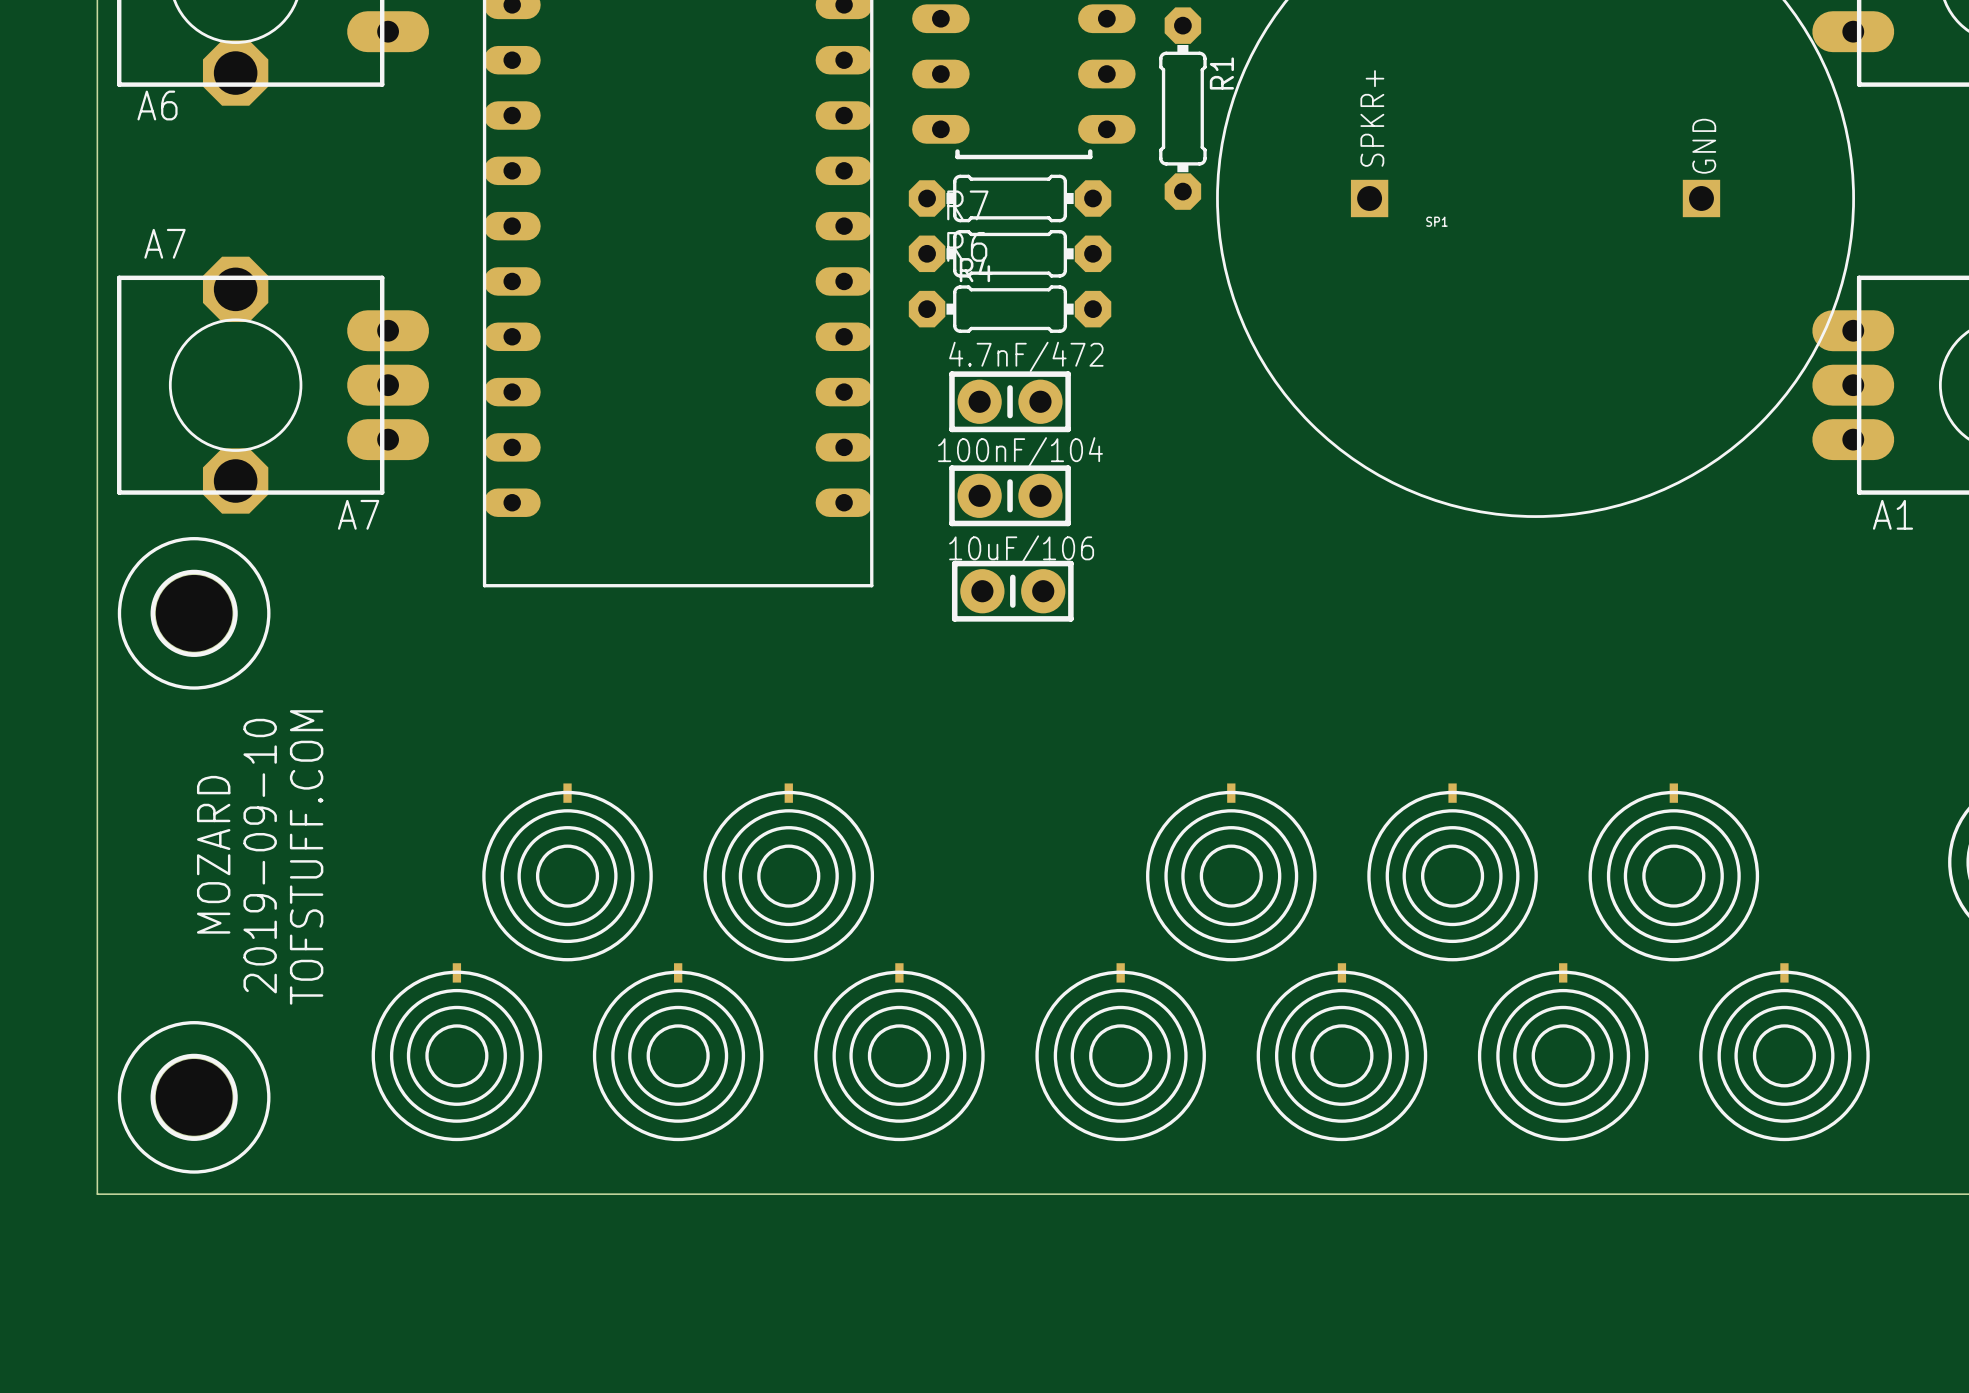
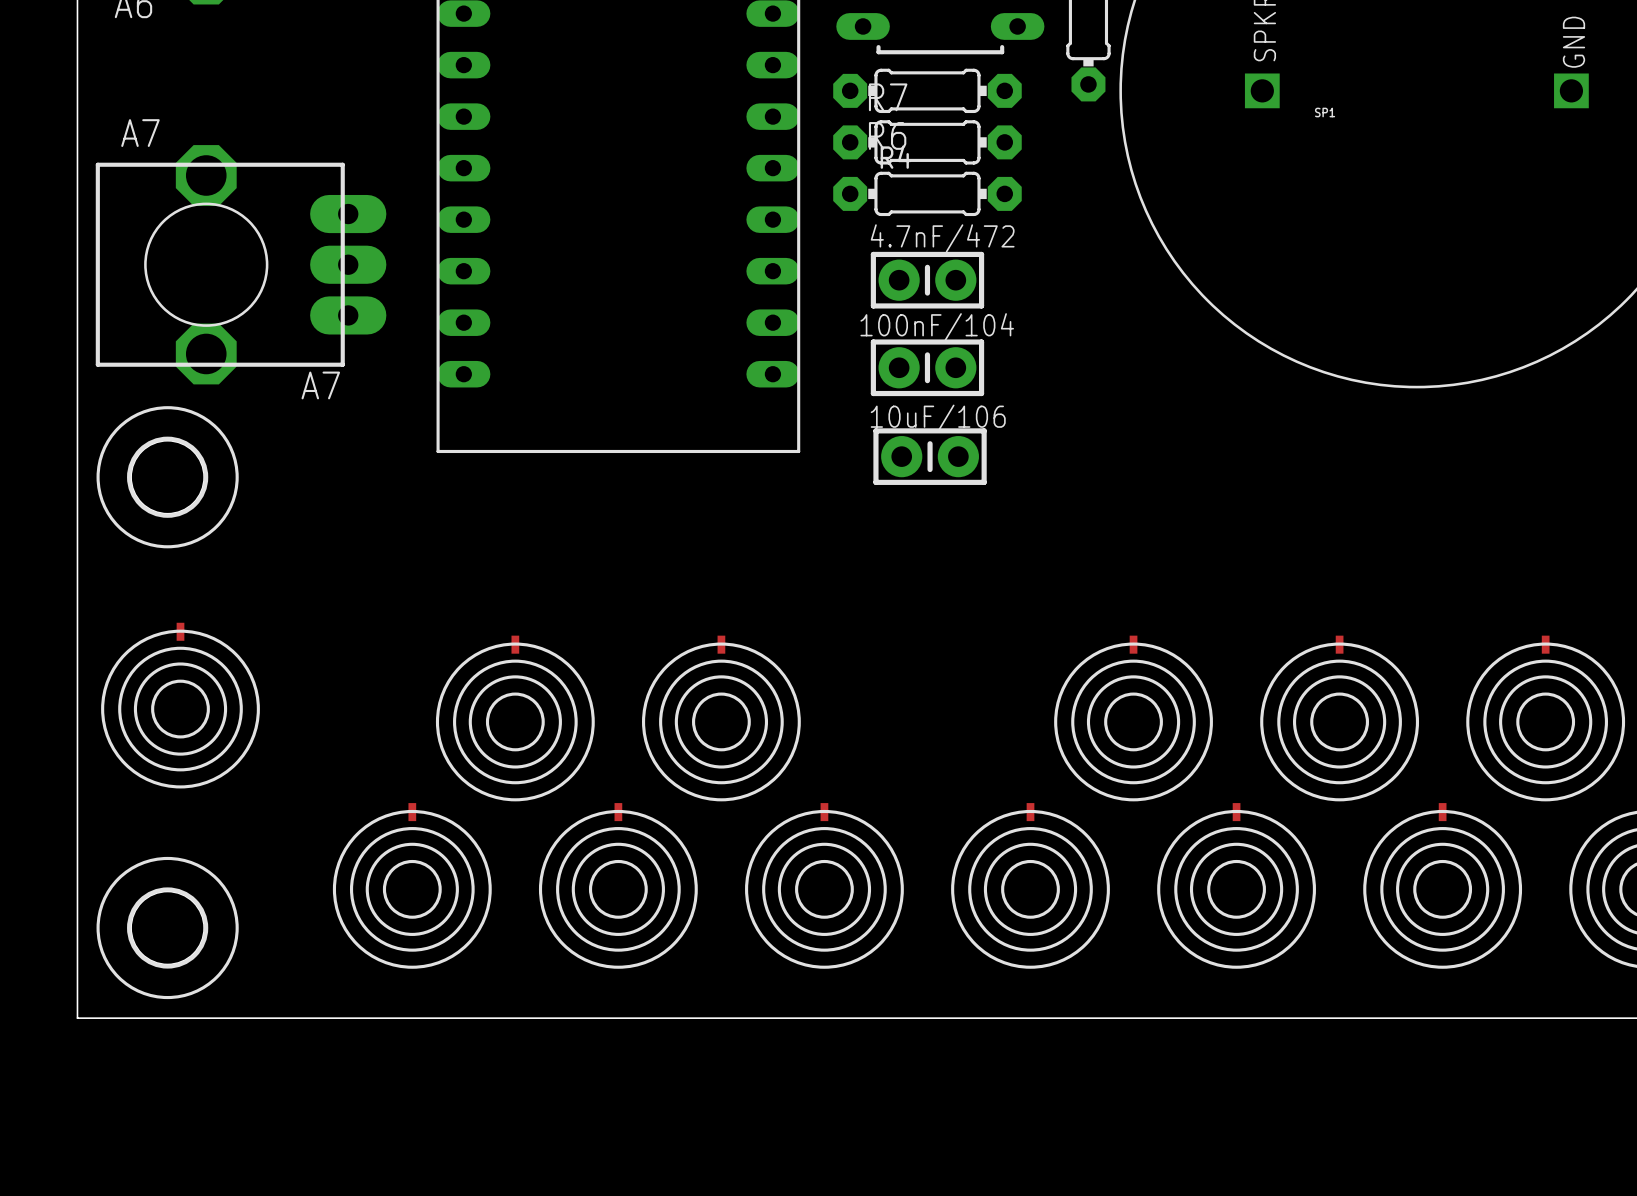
text: MOZARD (213, 854) -> none
text: 2019-09-10 (260, 856) -> none
text: TOFSTUFF.COM (306, 857) -> none
part: none -> (180, 705)

